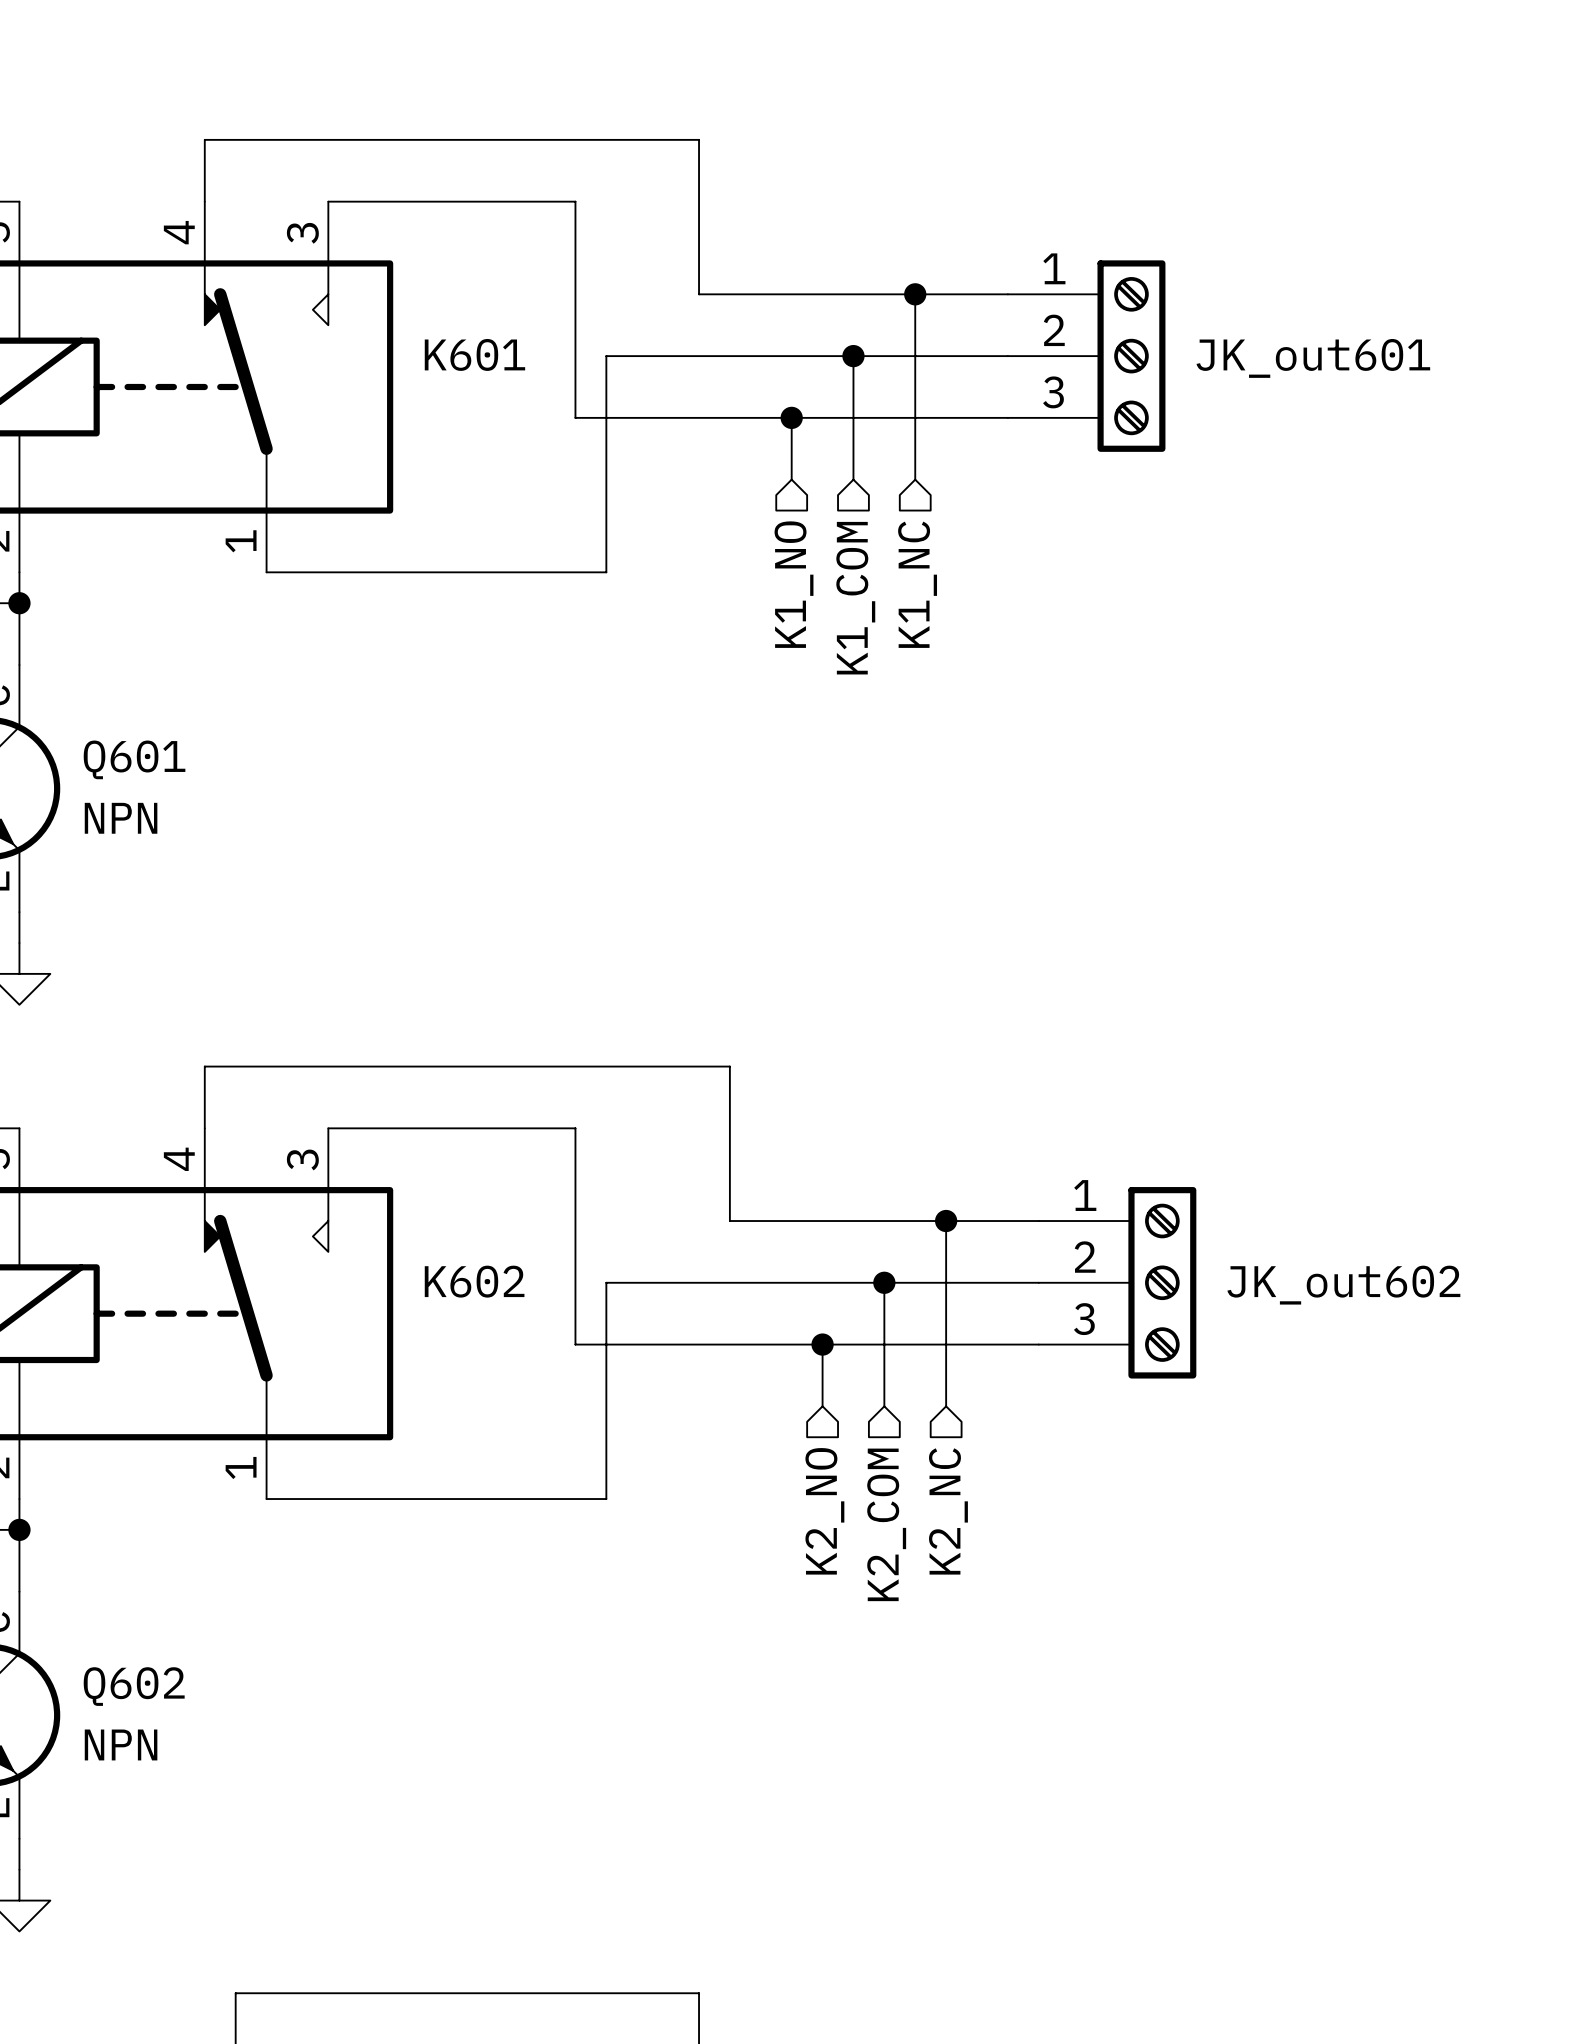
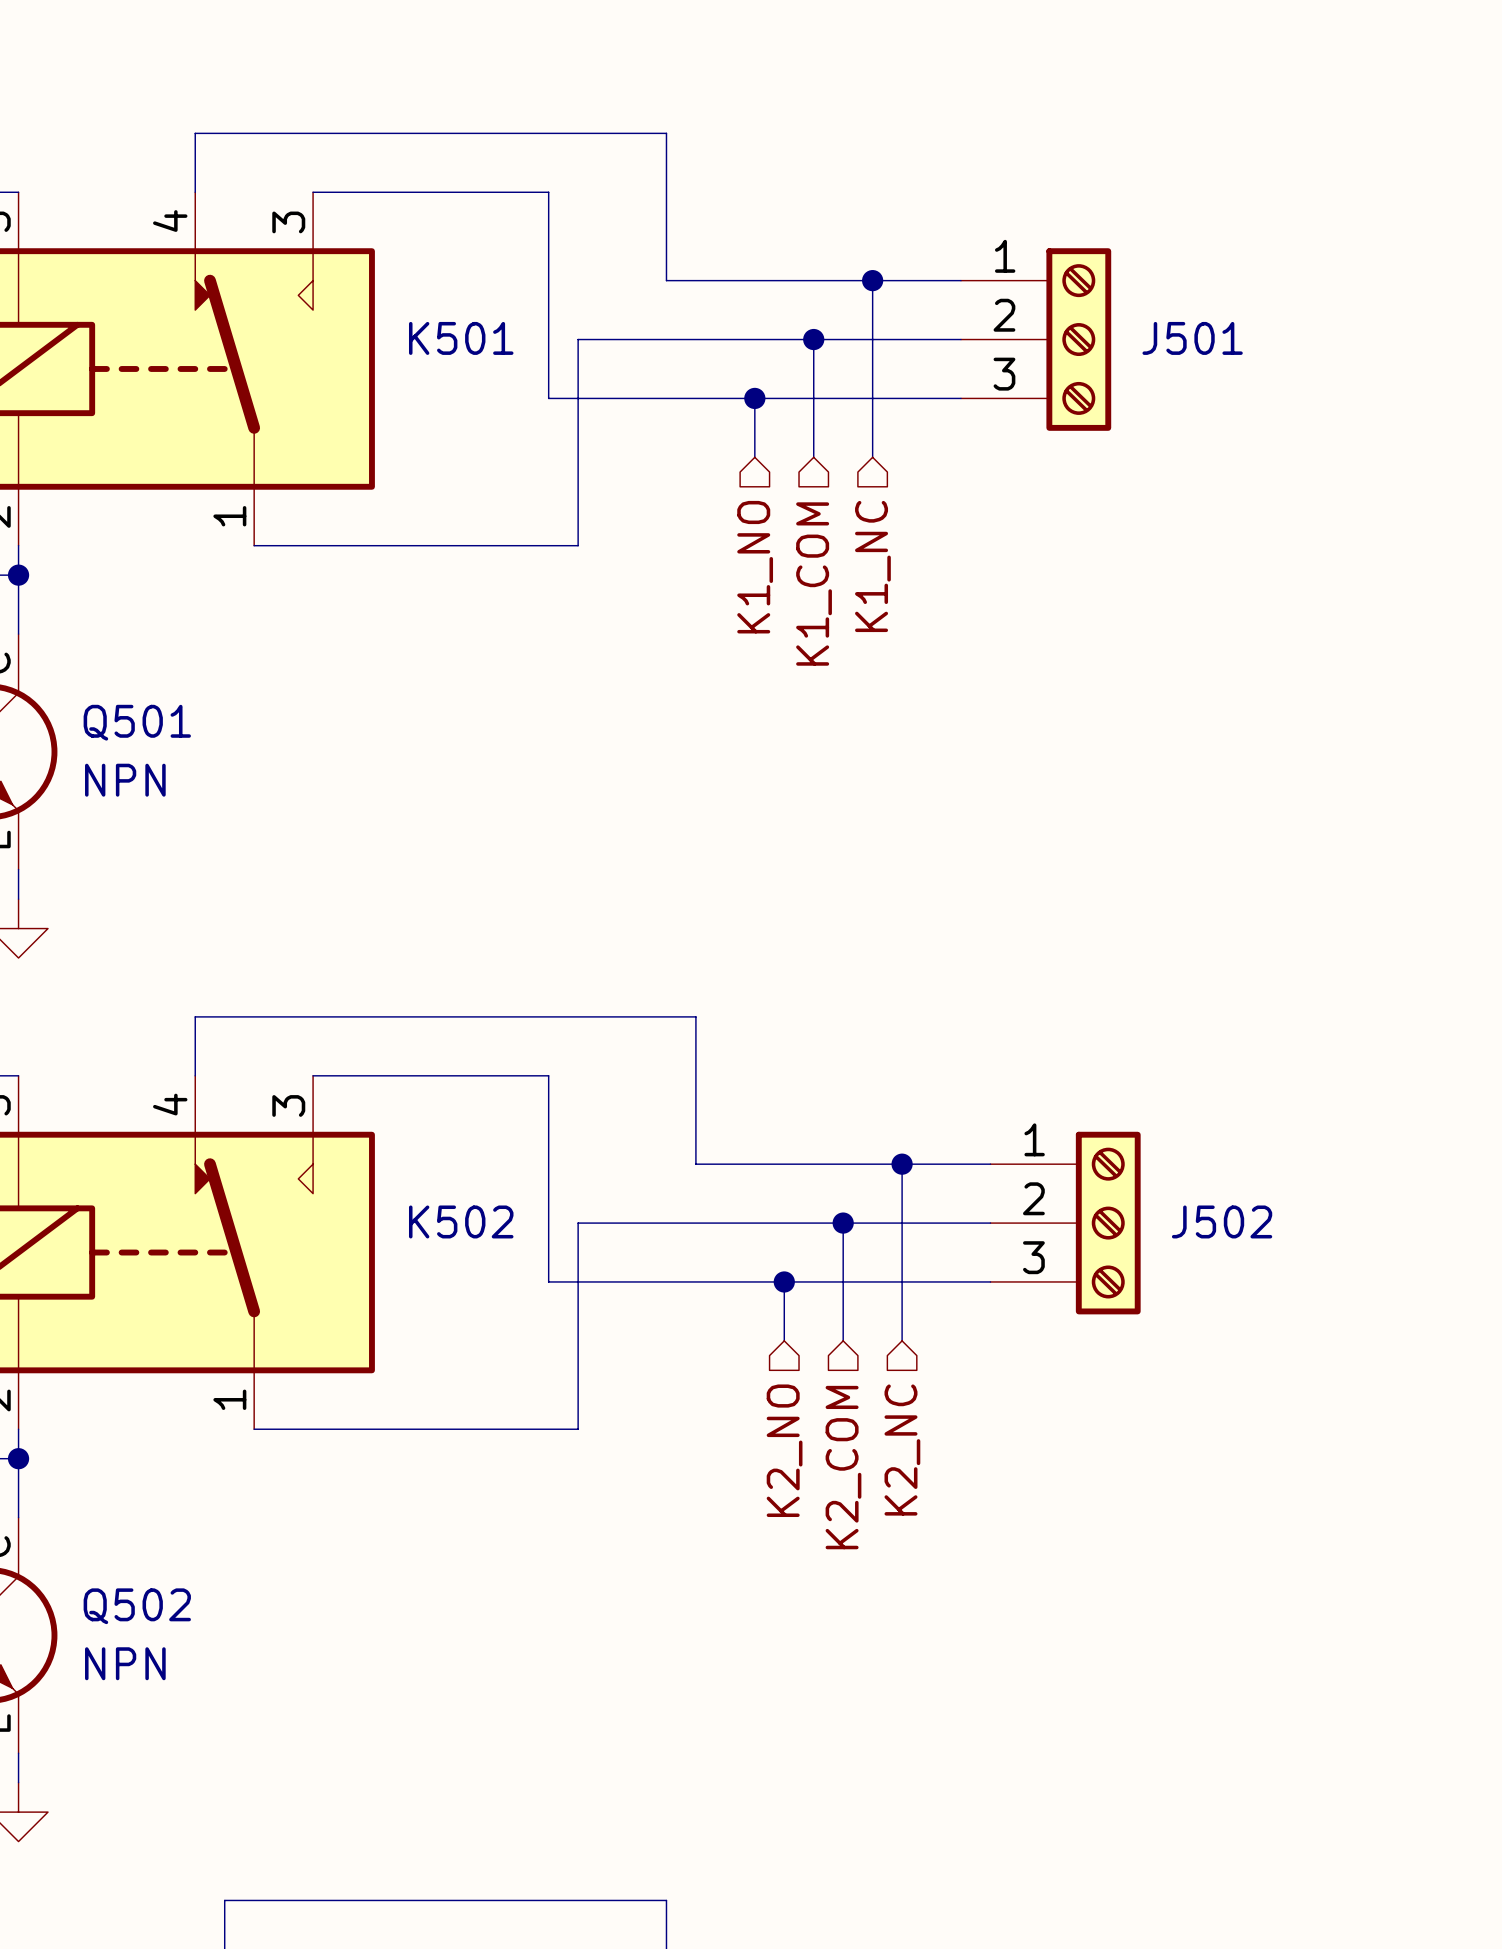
K601 name: K601 (474, 354) -> K501 (461, 338)
JK_out601 name: JK_out601 (1313, 358) -> J501 (1192, 338)
Q601 name: Q601 (134, 759) -> Q501 (137, 722)
K602 name: K602 (474, 1281) -> K502 (461, 1221)
JK_out602 name: JK_out602 (1343, 1285) -> J502 (1222, 1221)
Q602 name: Q602 (134, 1686) -> Q502 (137, 1606)

